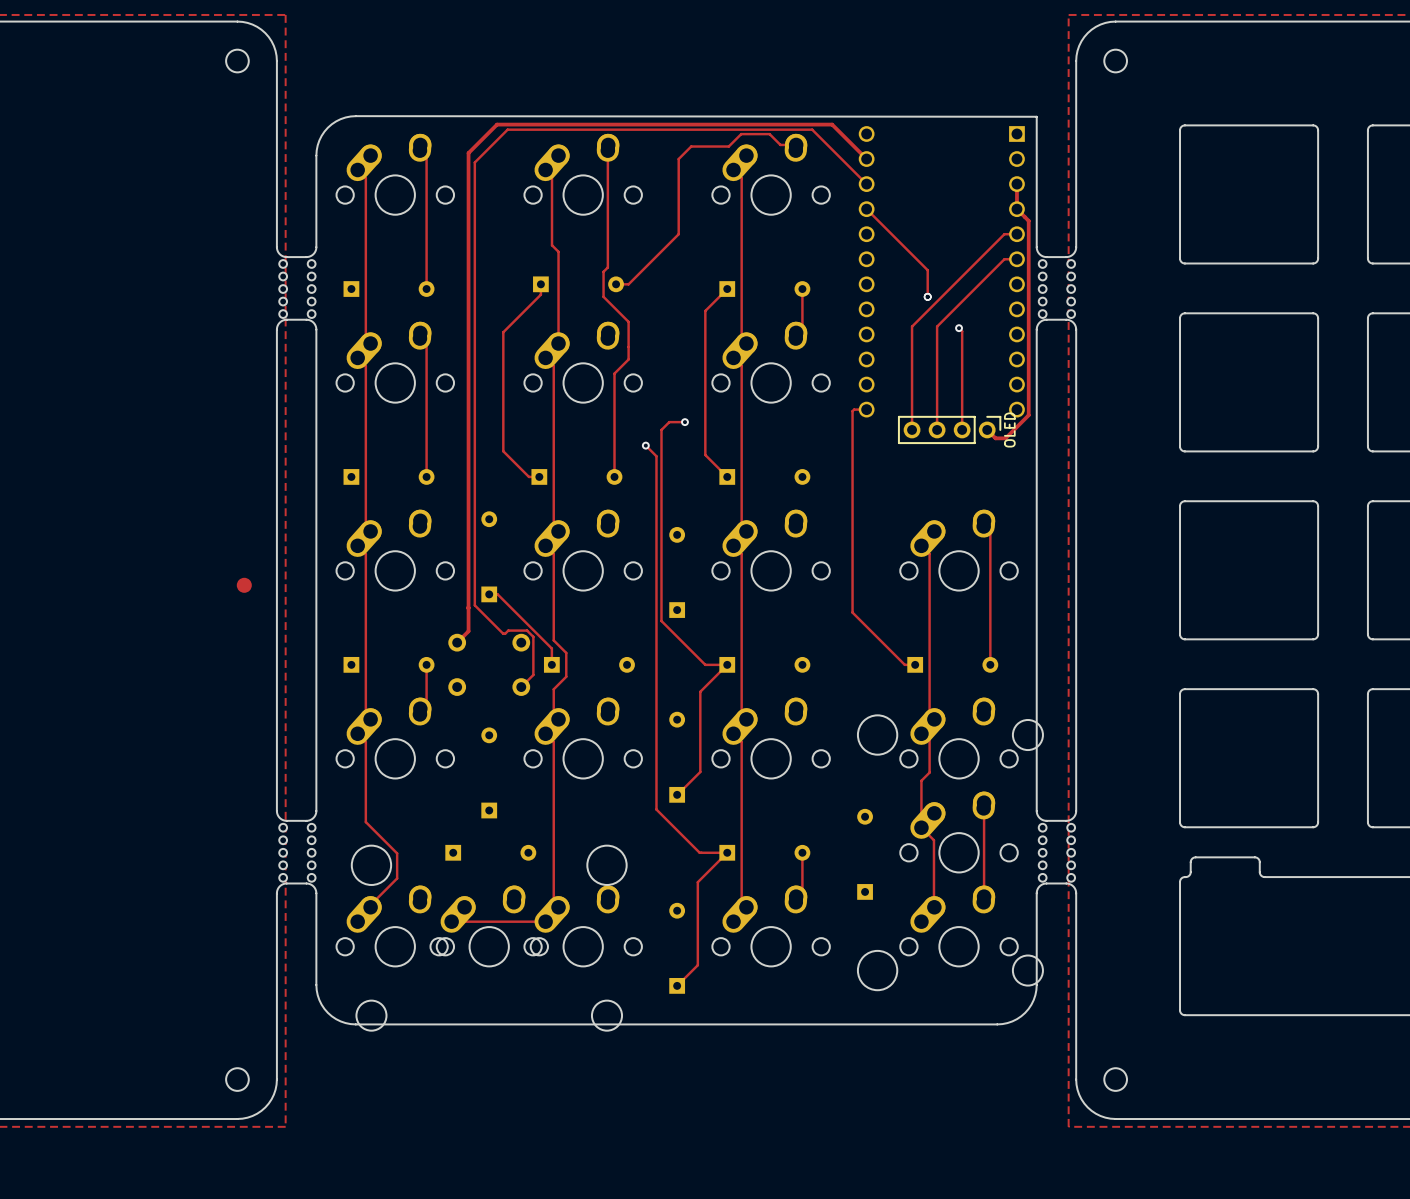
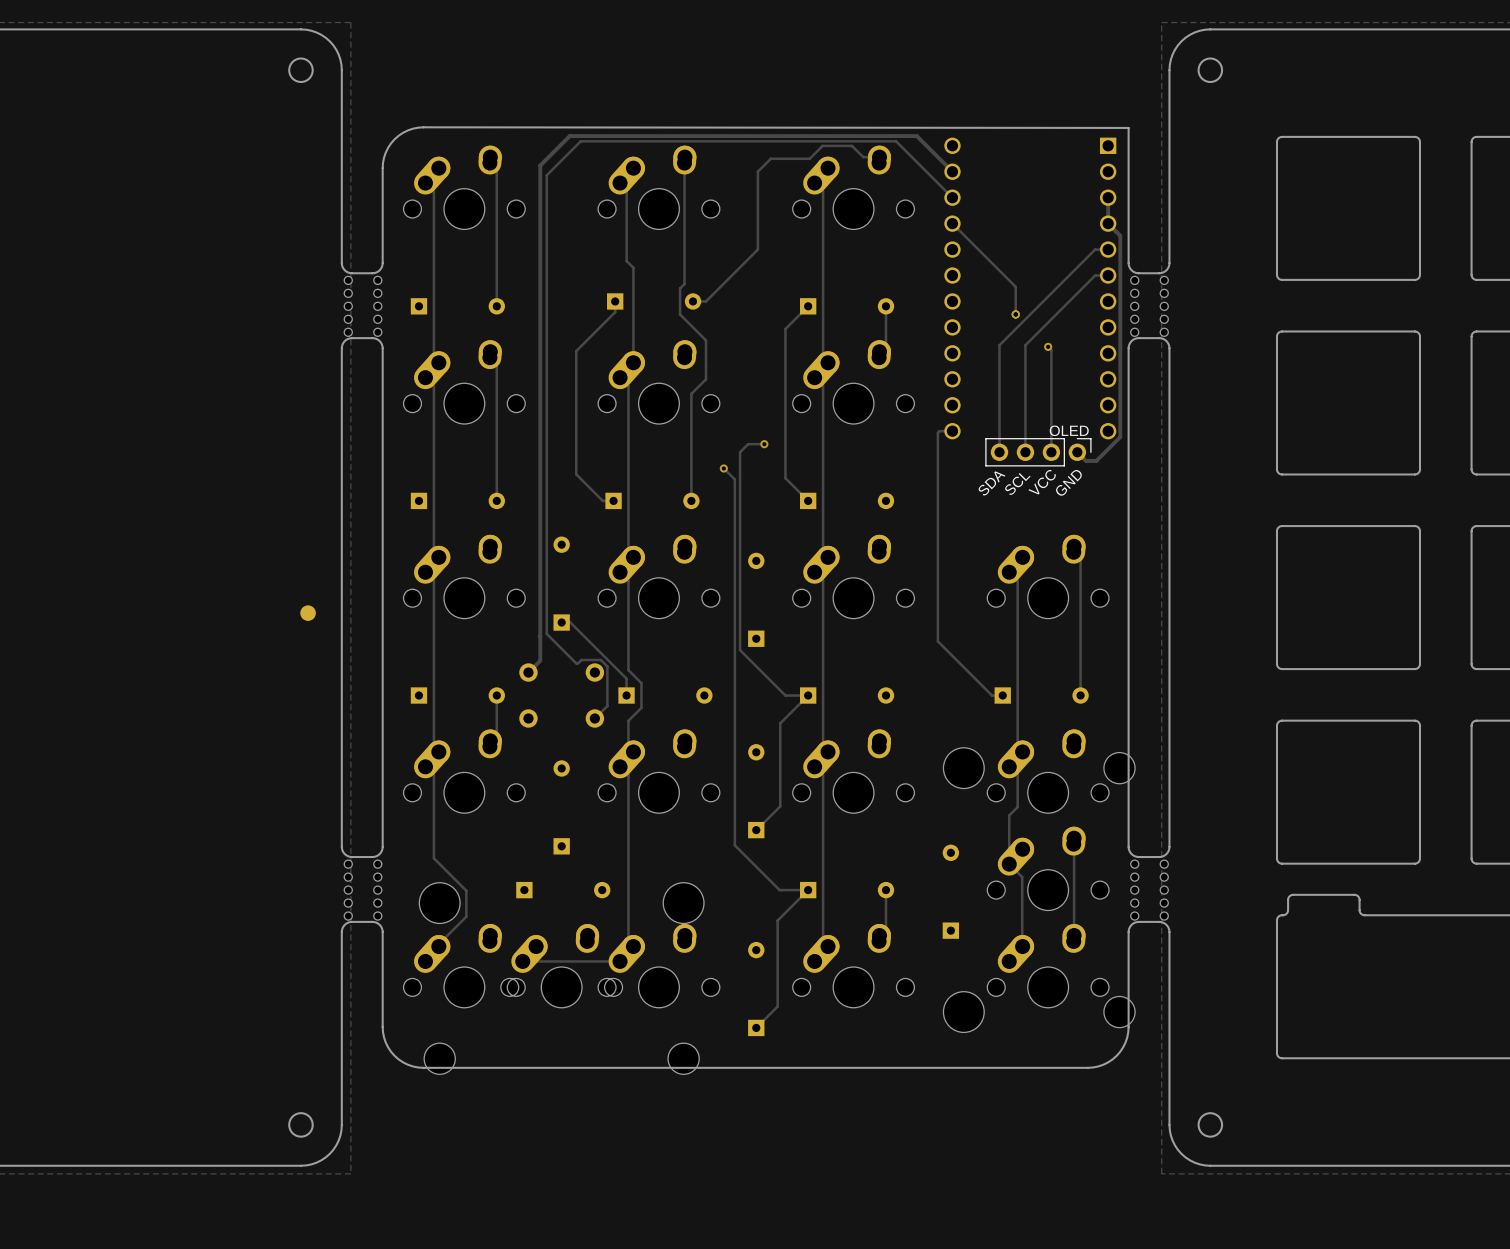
OLED name rotation: 0° (1009, 429) -> 90° clockwise (1069, 430)
text: none -> VCC (1042, 482)
text: none -> GND (1068, 482)
text: none -> SDA (991, 483)
text: none -> SCL (1017, 484)

